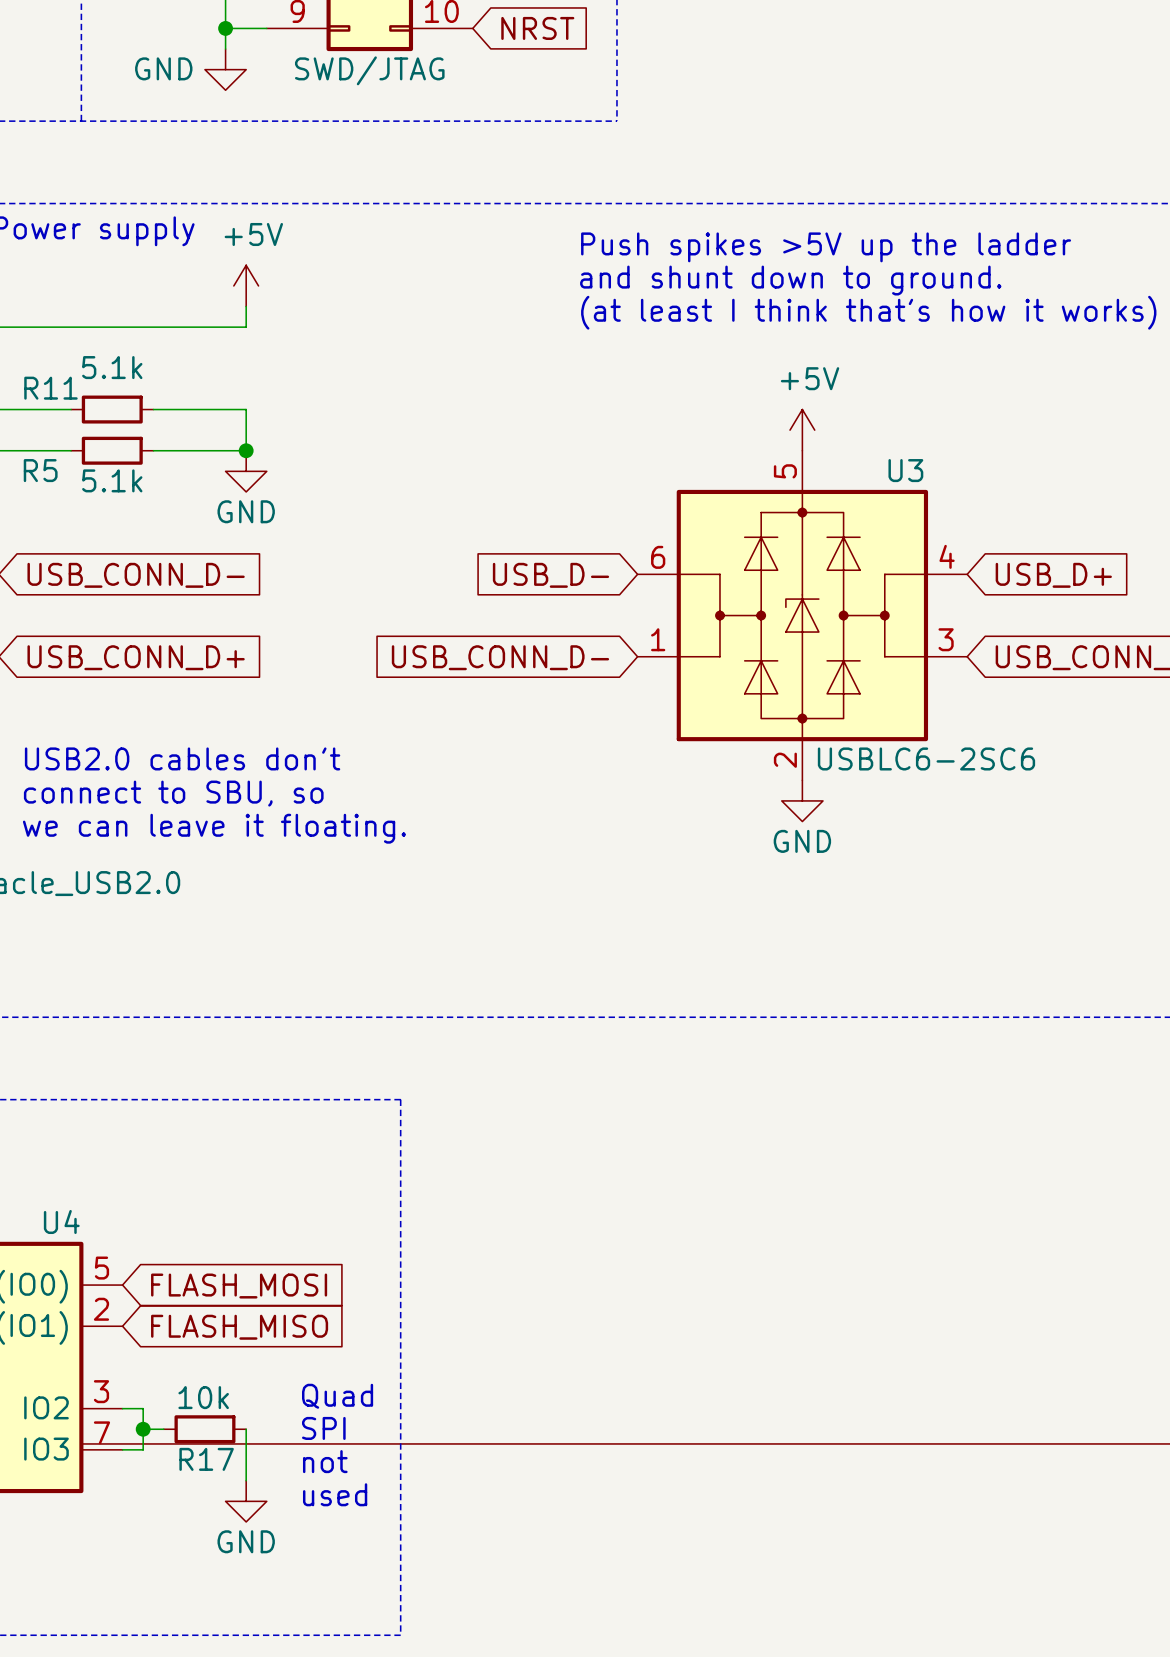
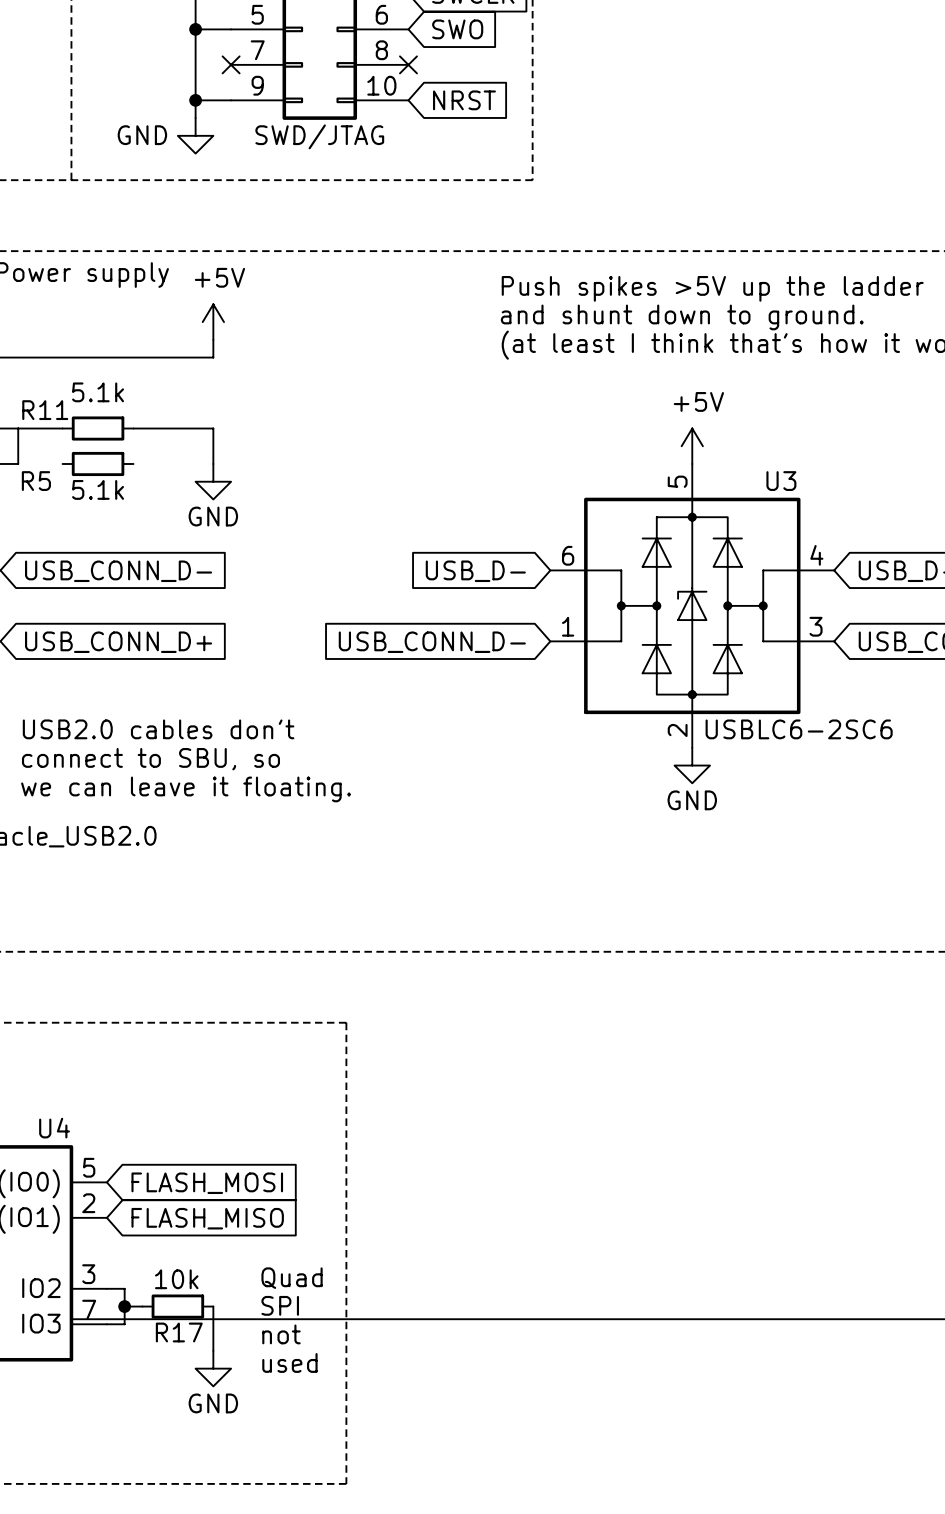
wire: (19, 450) (71, 450) -> (18, 463) (18, 428)
wire: (153, 450) (246, 450) -> none
junction: (246, 450) -> none

